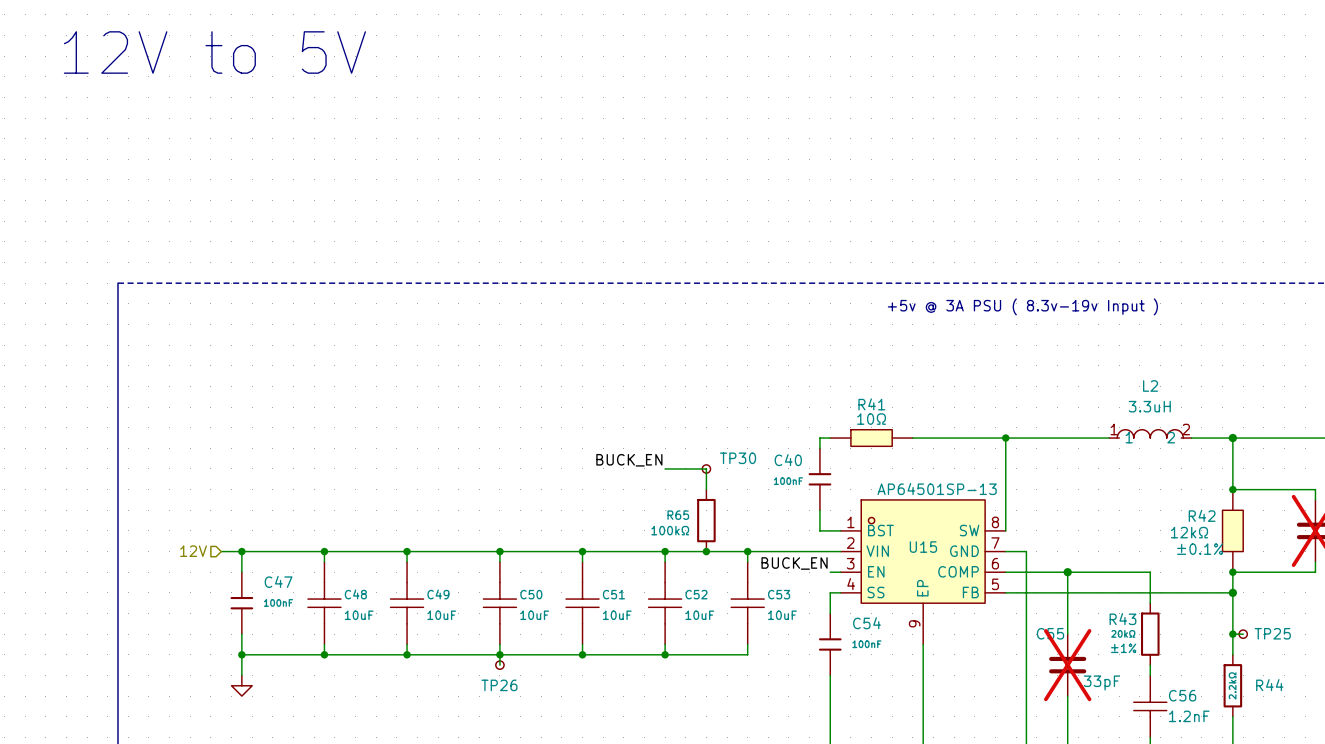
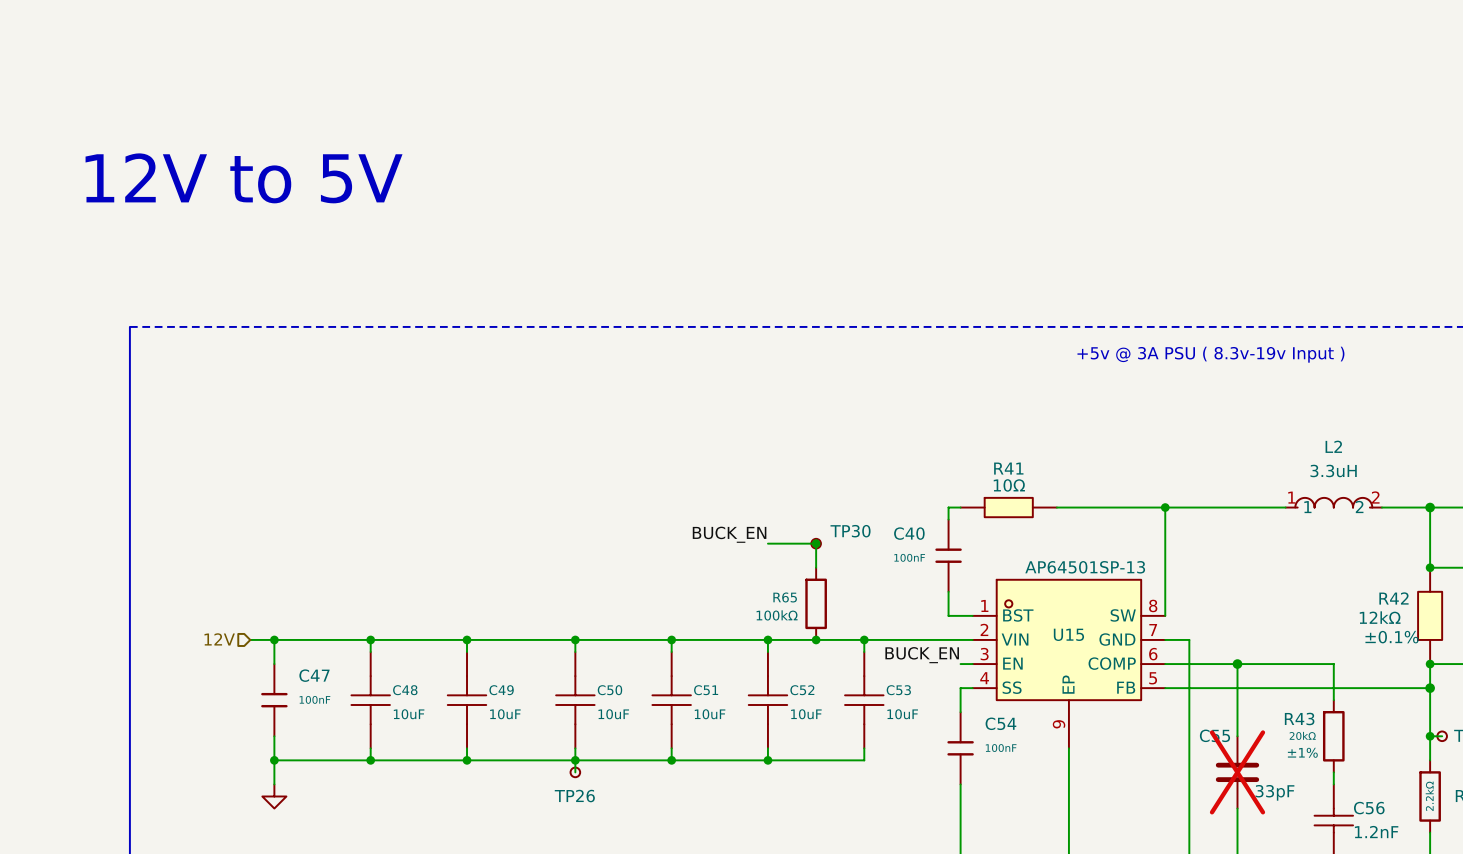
text position: 12V to 5V (214, 52) -> 12V to 5V (244, 178)
junction: none -> (816, 543)

